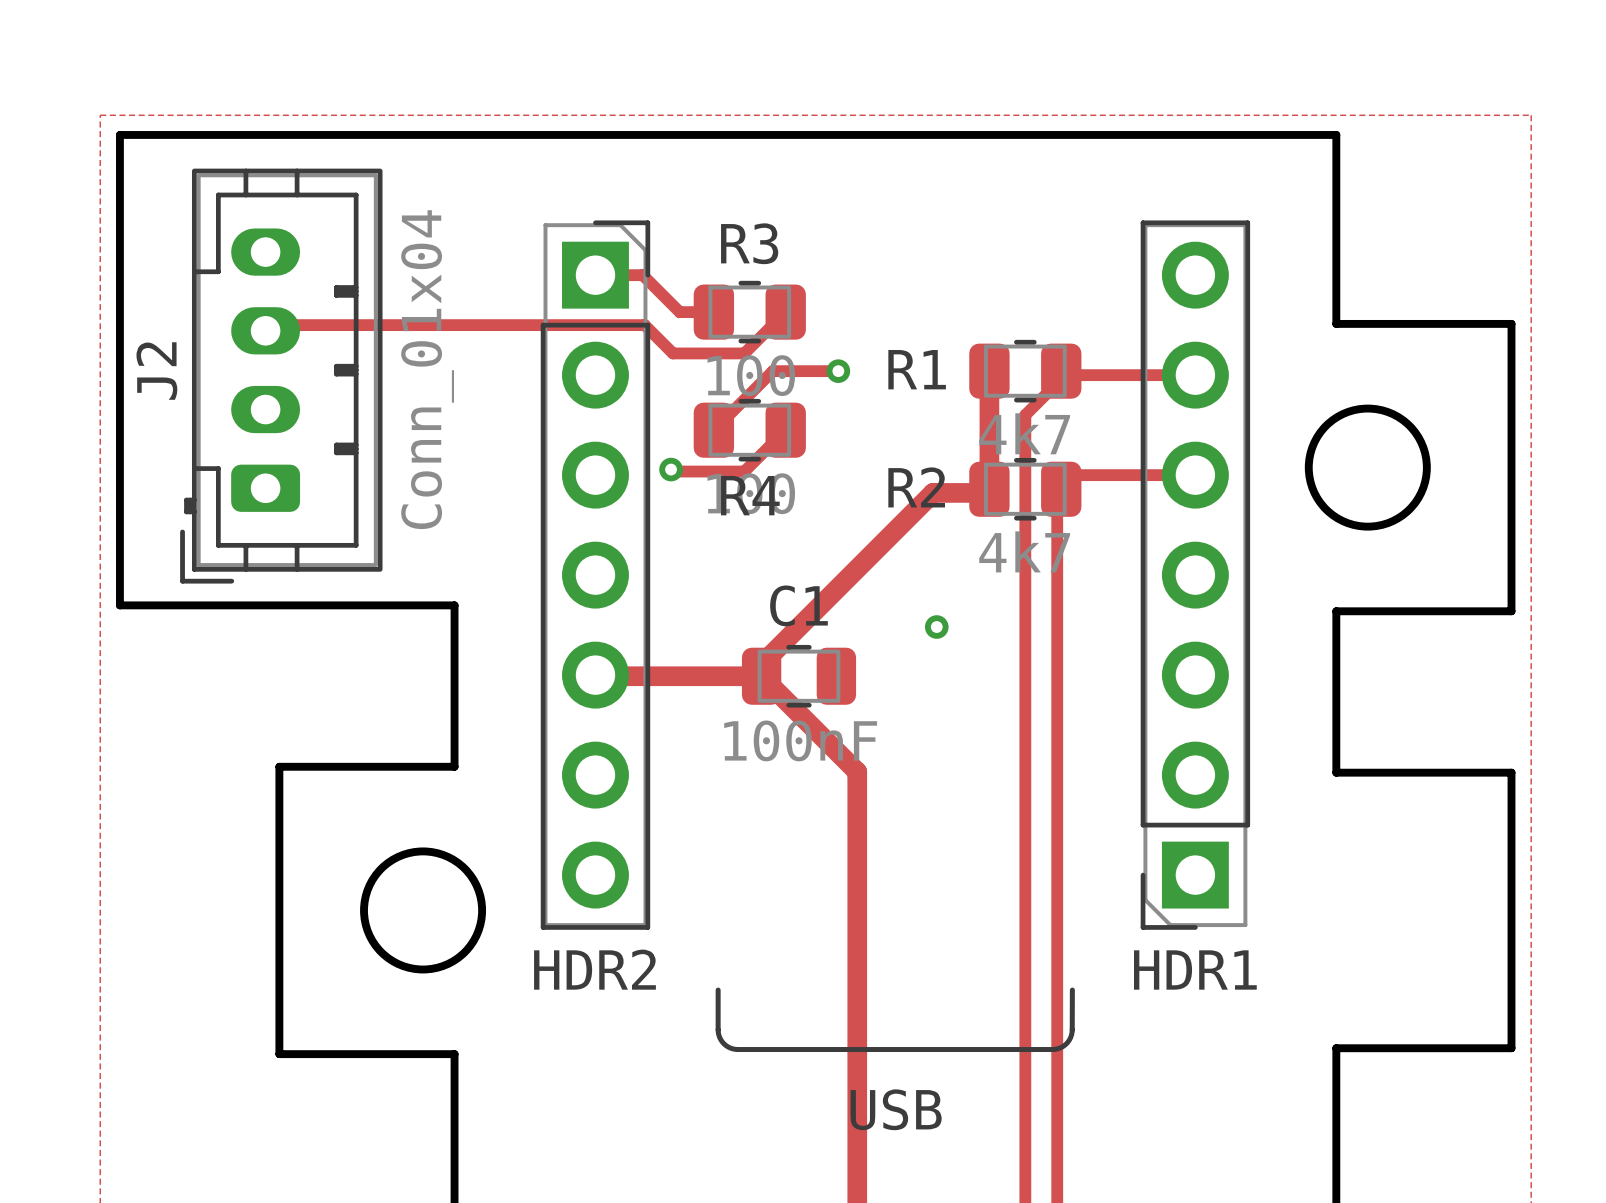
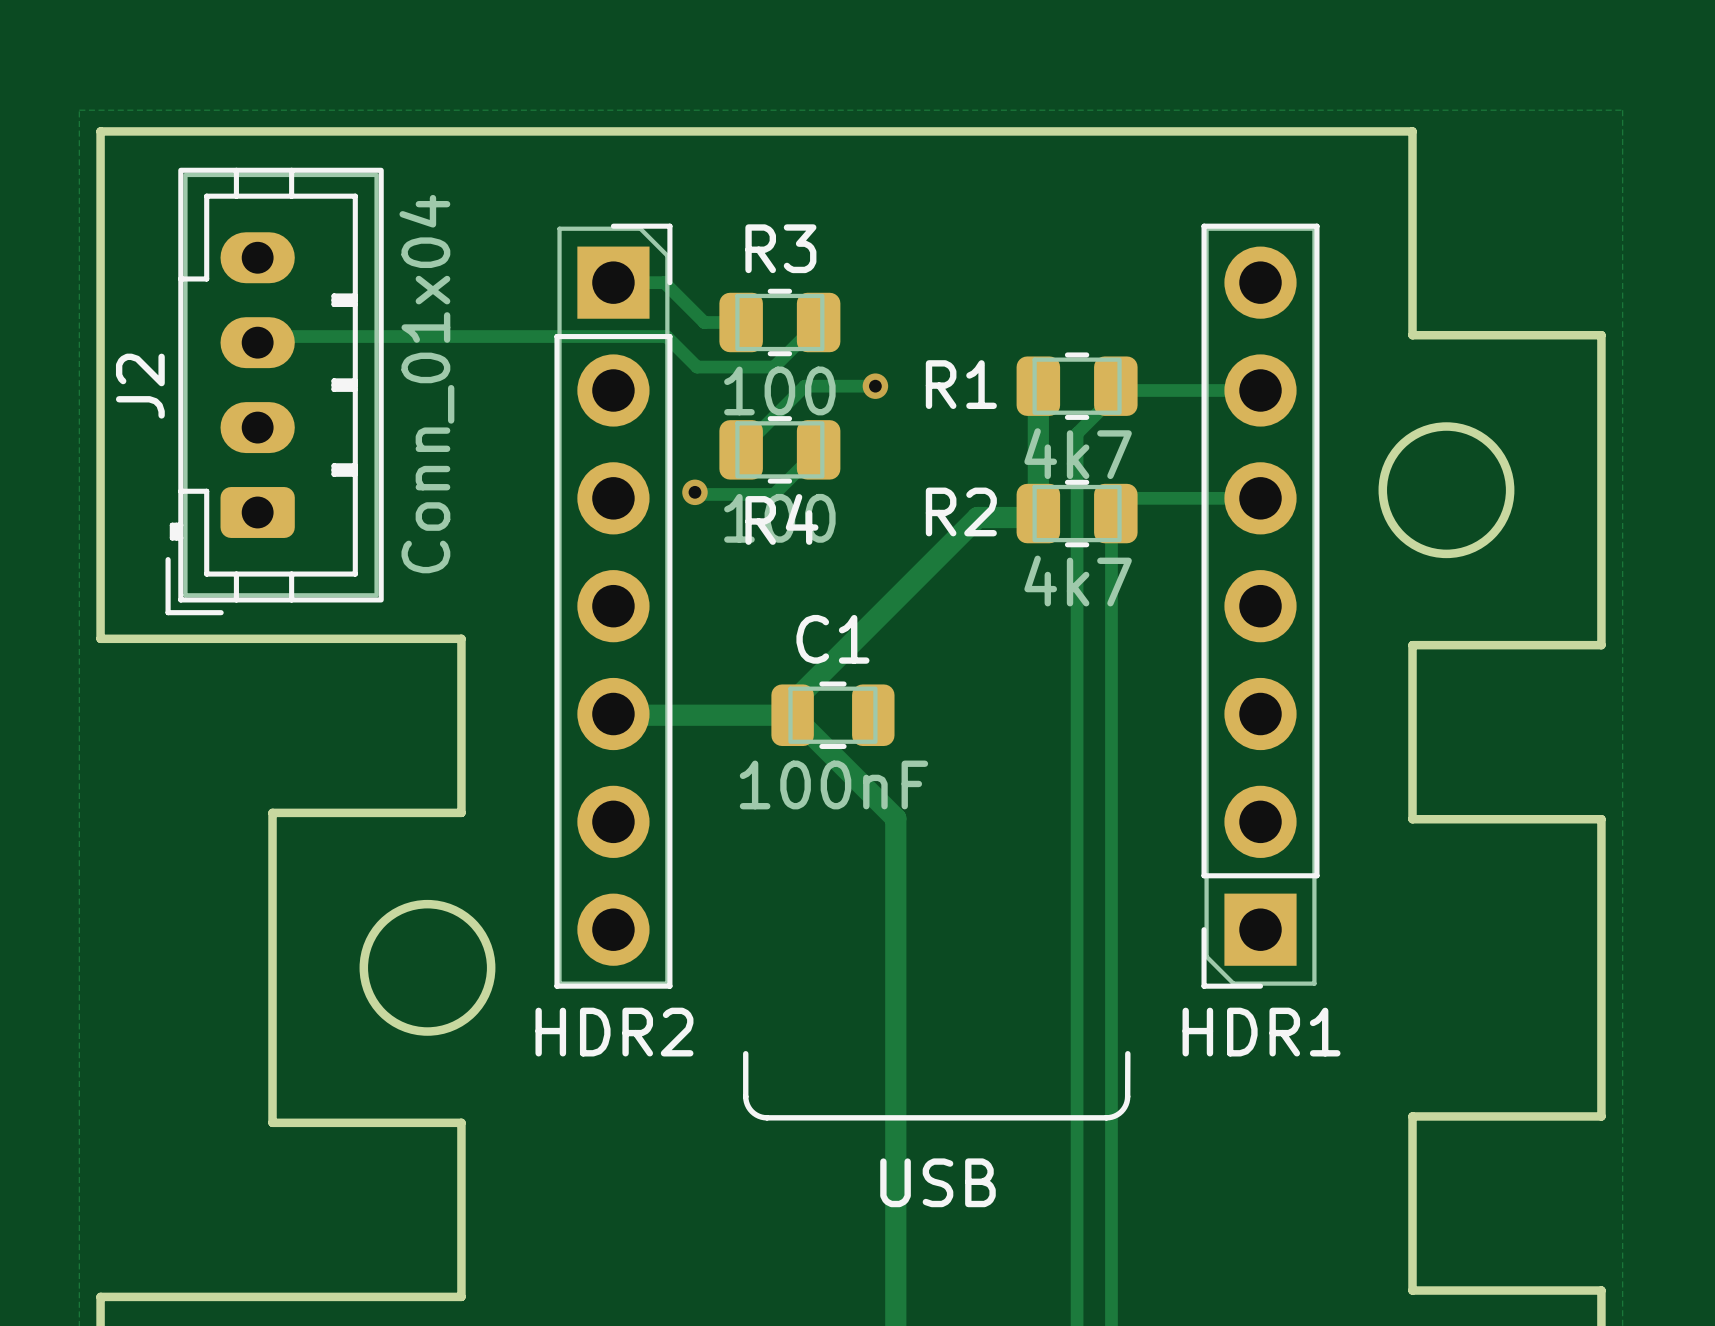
via: (936, 627) -> none

